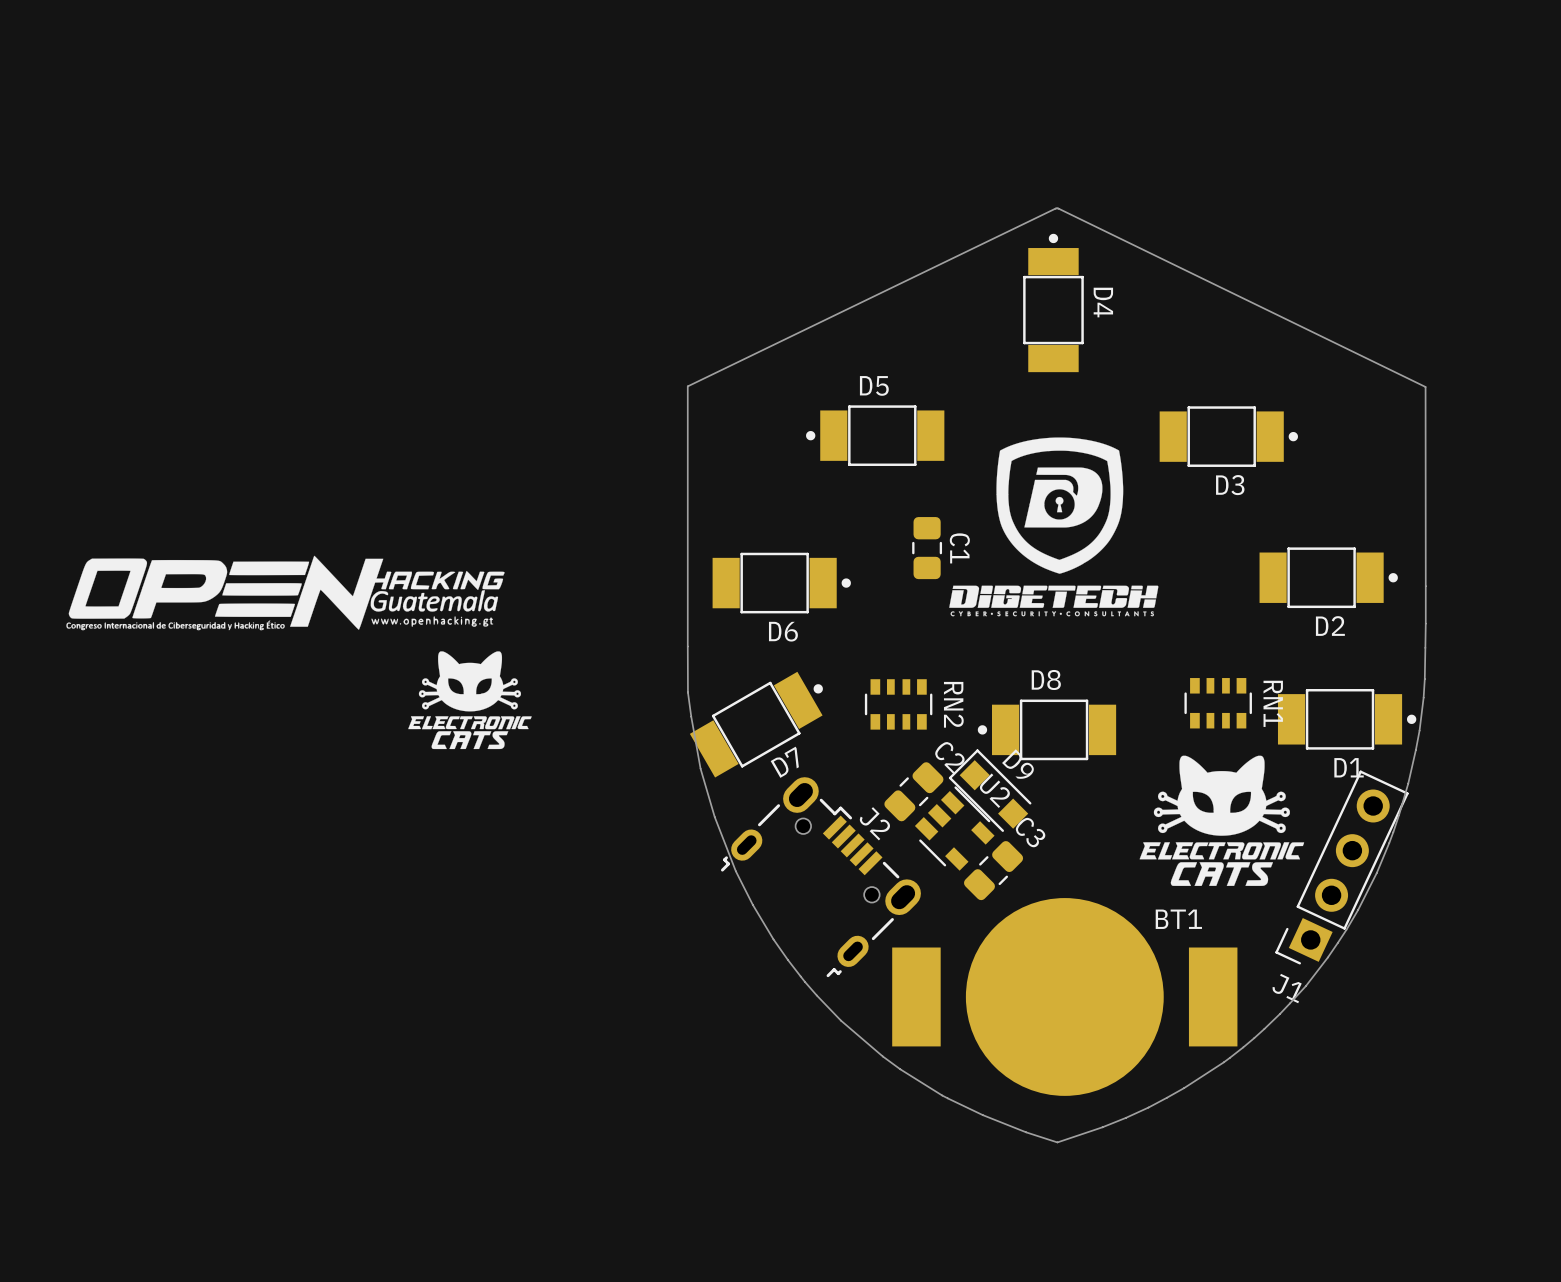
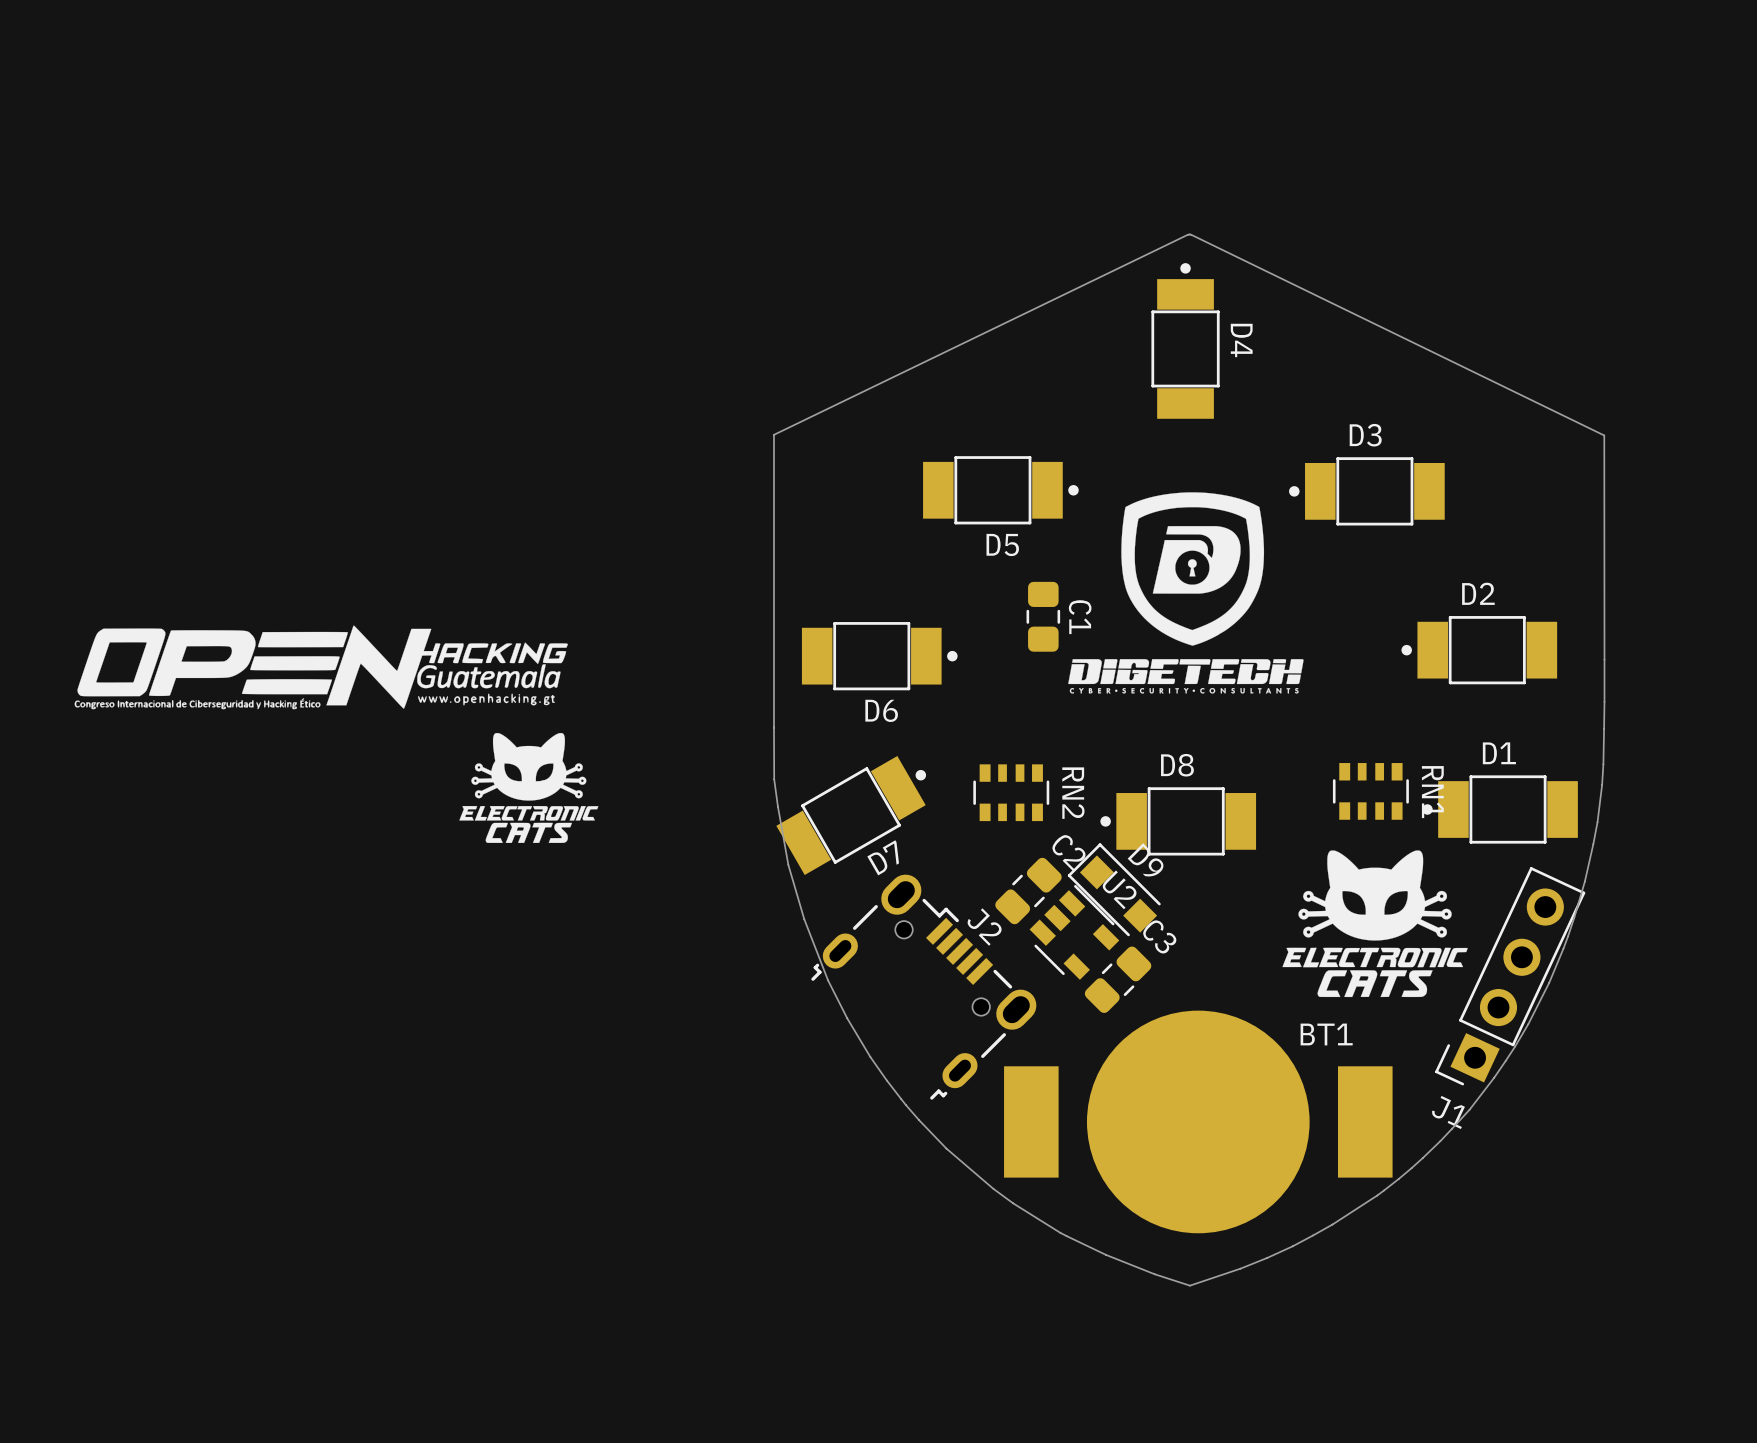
D5 rotation: 0° (875, 435) -> 180° (1000, 490)
D3 rotation: 0° (1228, 436) -> 180° (1366, 491)
D2 rotation: 0° (1328, 577) -> 180° (1479, 650)
D1 rotation: 0° (1347, 719) -> 180° (1500, 809)

